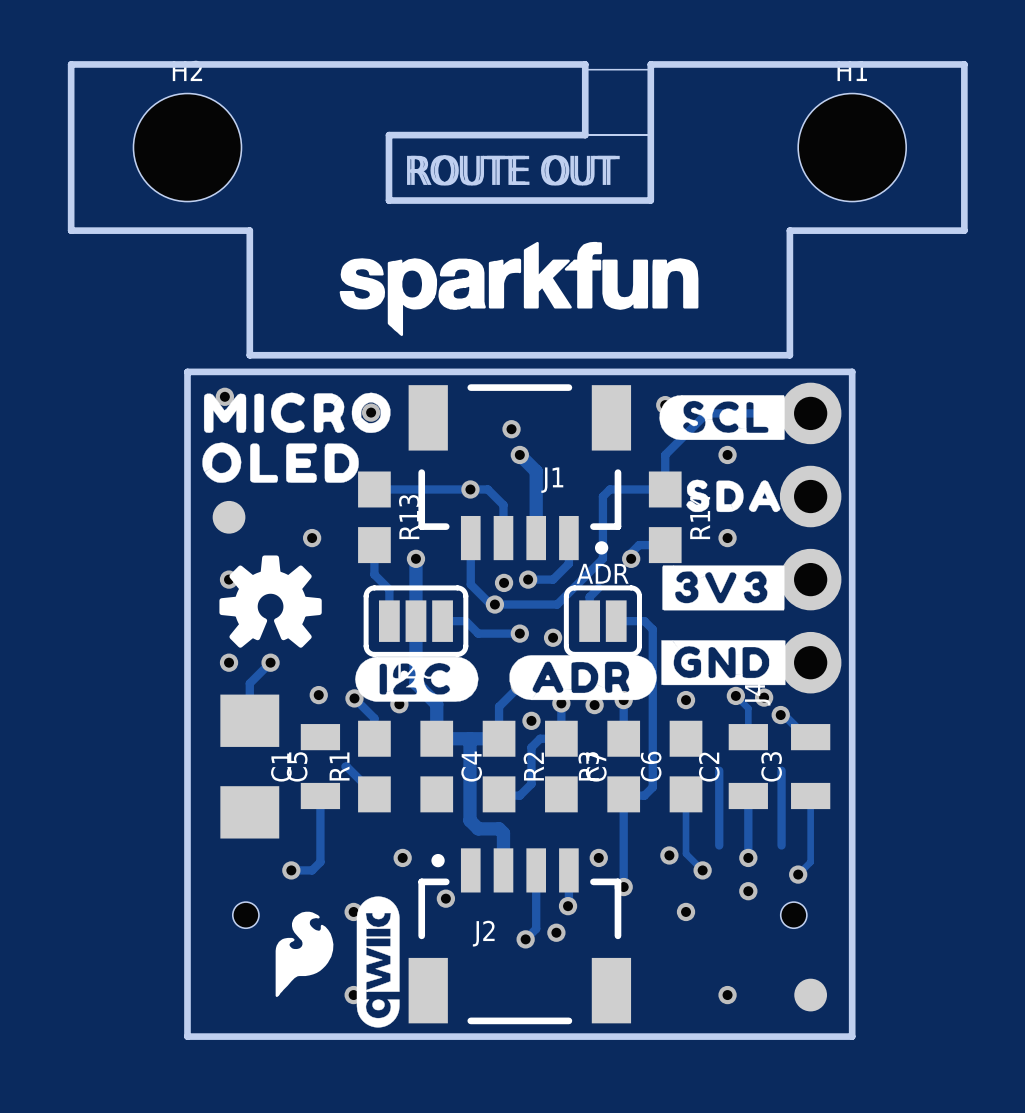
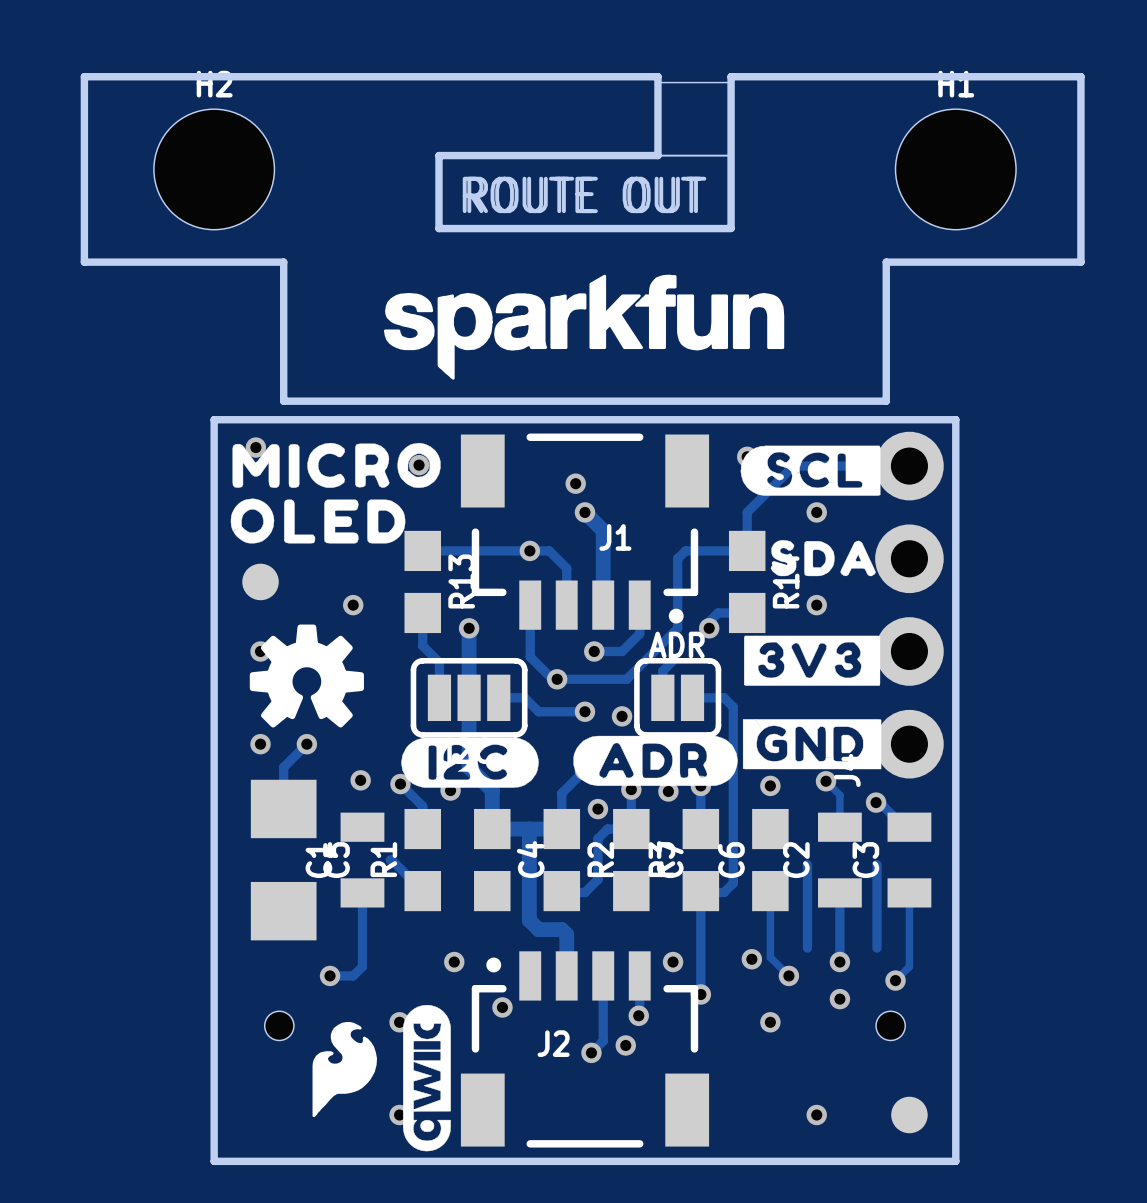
via: (504, 582) -> none
via: (764, 697) -> none

